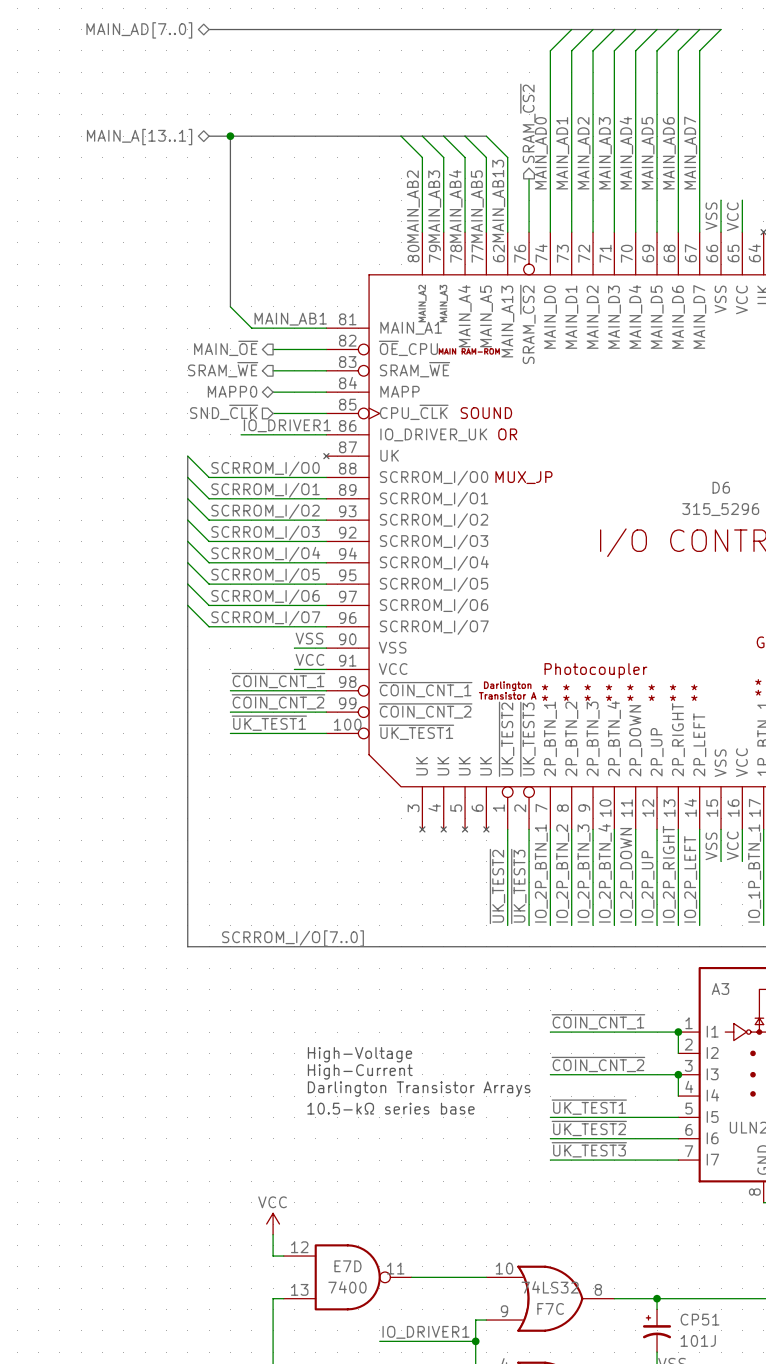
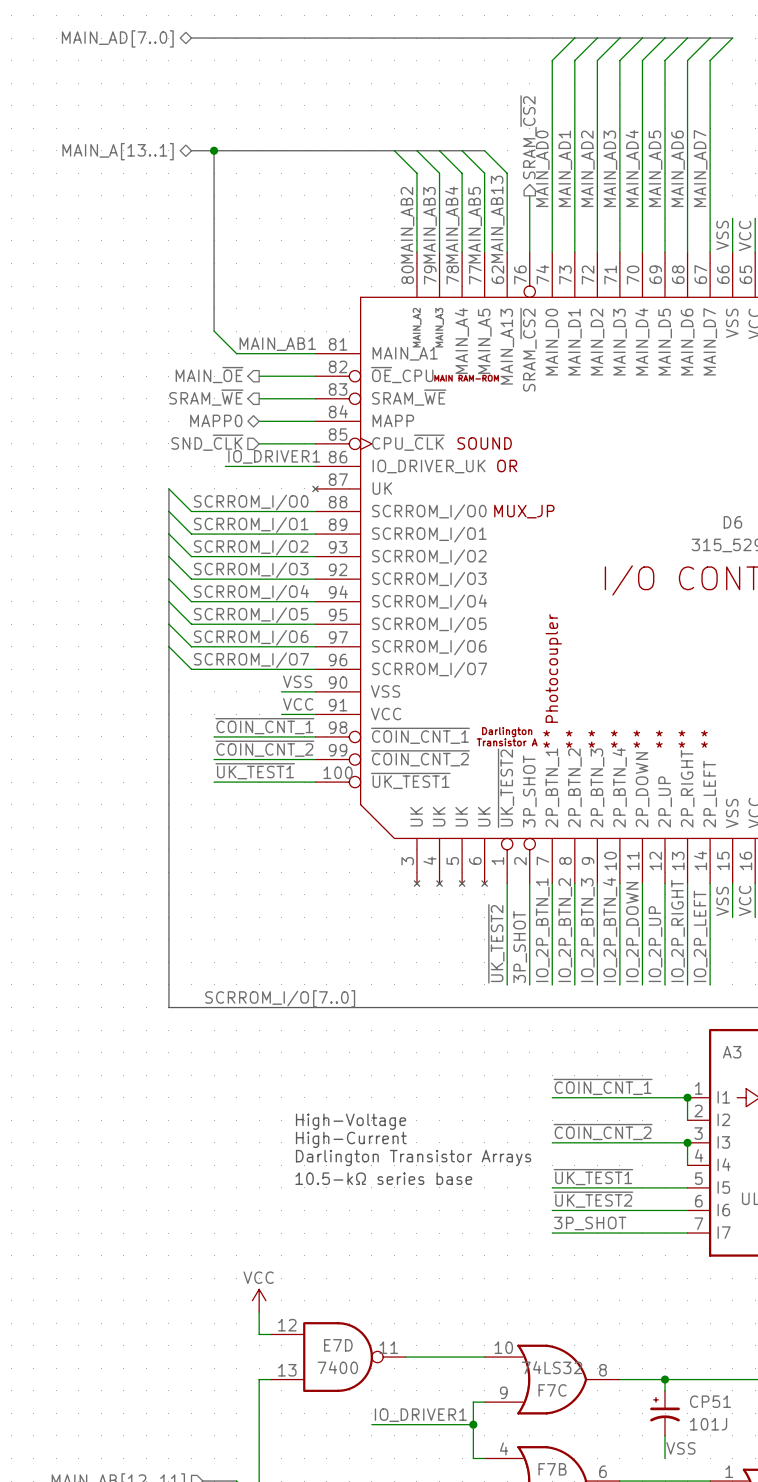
D6 text rotation: 0° (595, 670) -> 90° counterclockwise (553, 668)
D6 pin name: ~{UK_TEST3} (527, 739) -> 3P_SHOT (529, 791)
label: ~{UK_TEST3} (518, 886) -> 3P_SHOT (520, 947)
label: ~{UK_TEST3} (589, 1149) -> 3P_SHOT (590, 1223)

